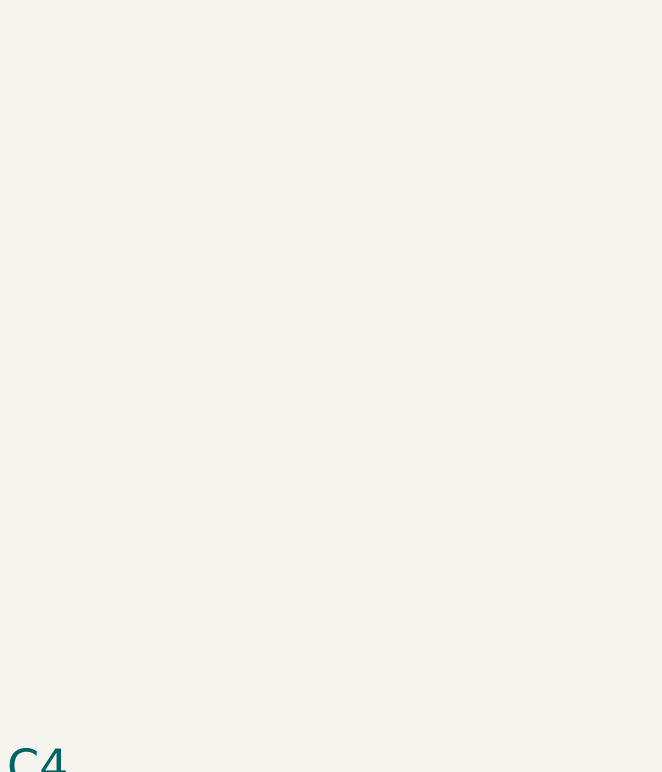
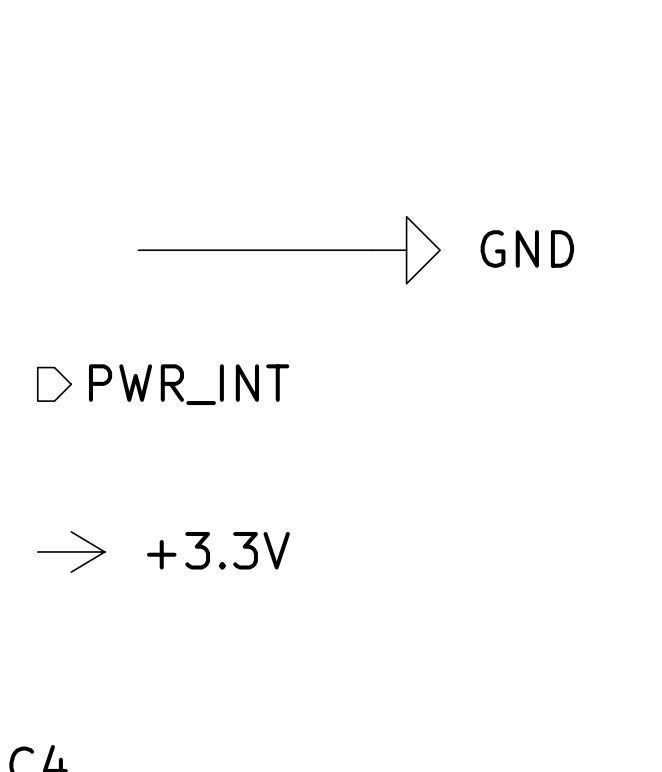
wire: none -> (138, 250) (373, 250)
power symbol: none -> GND (406, 250)
hierarchical label: none -> PWR_INT (189, 384)
power symbol: none -> +3.3V (71, 551)

